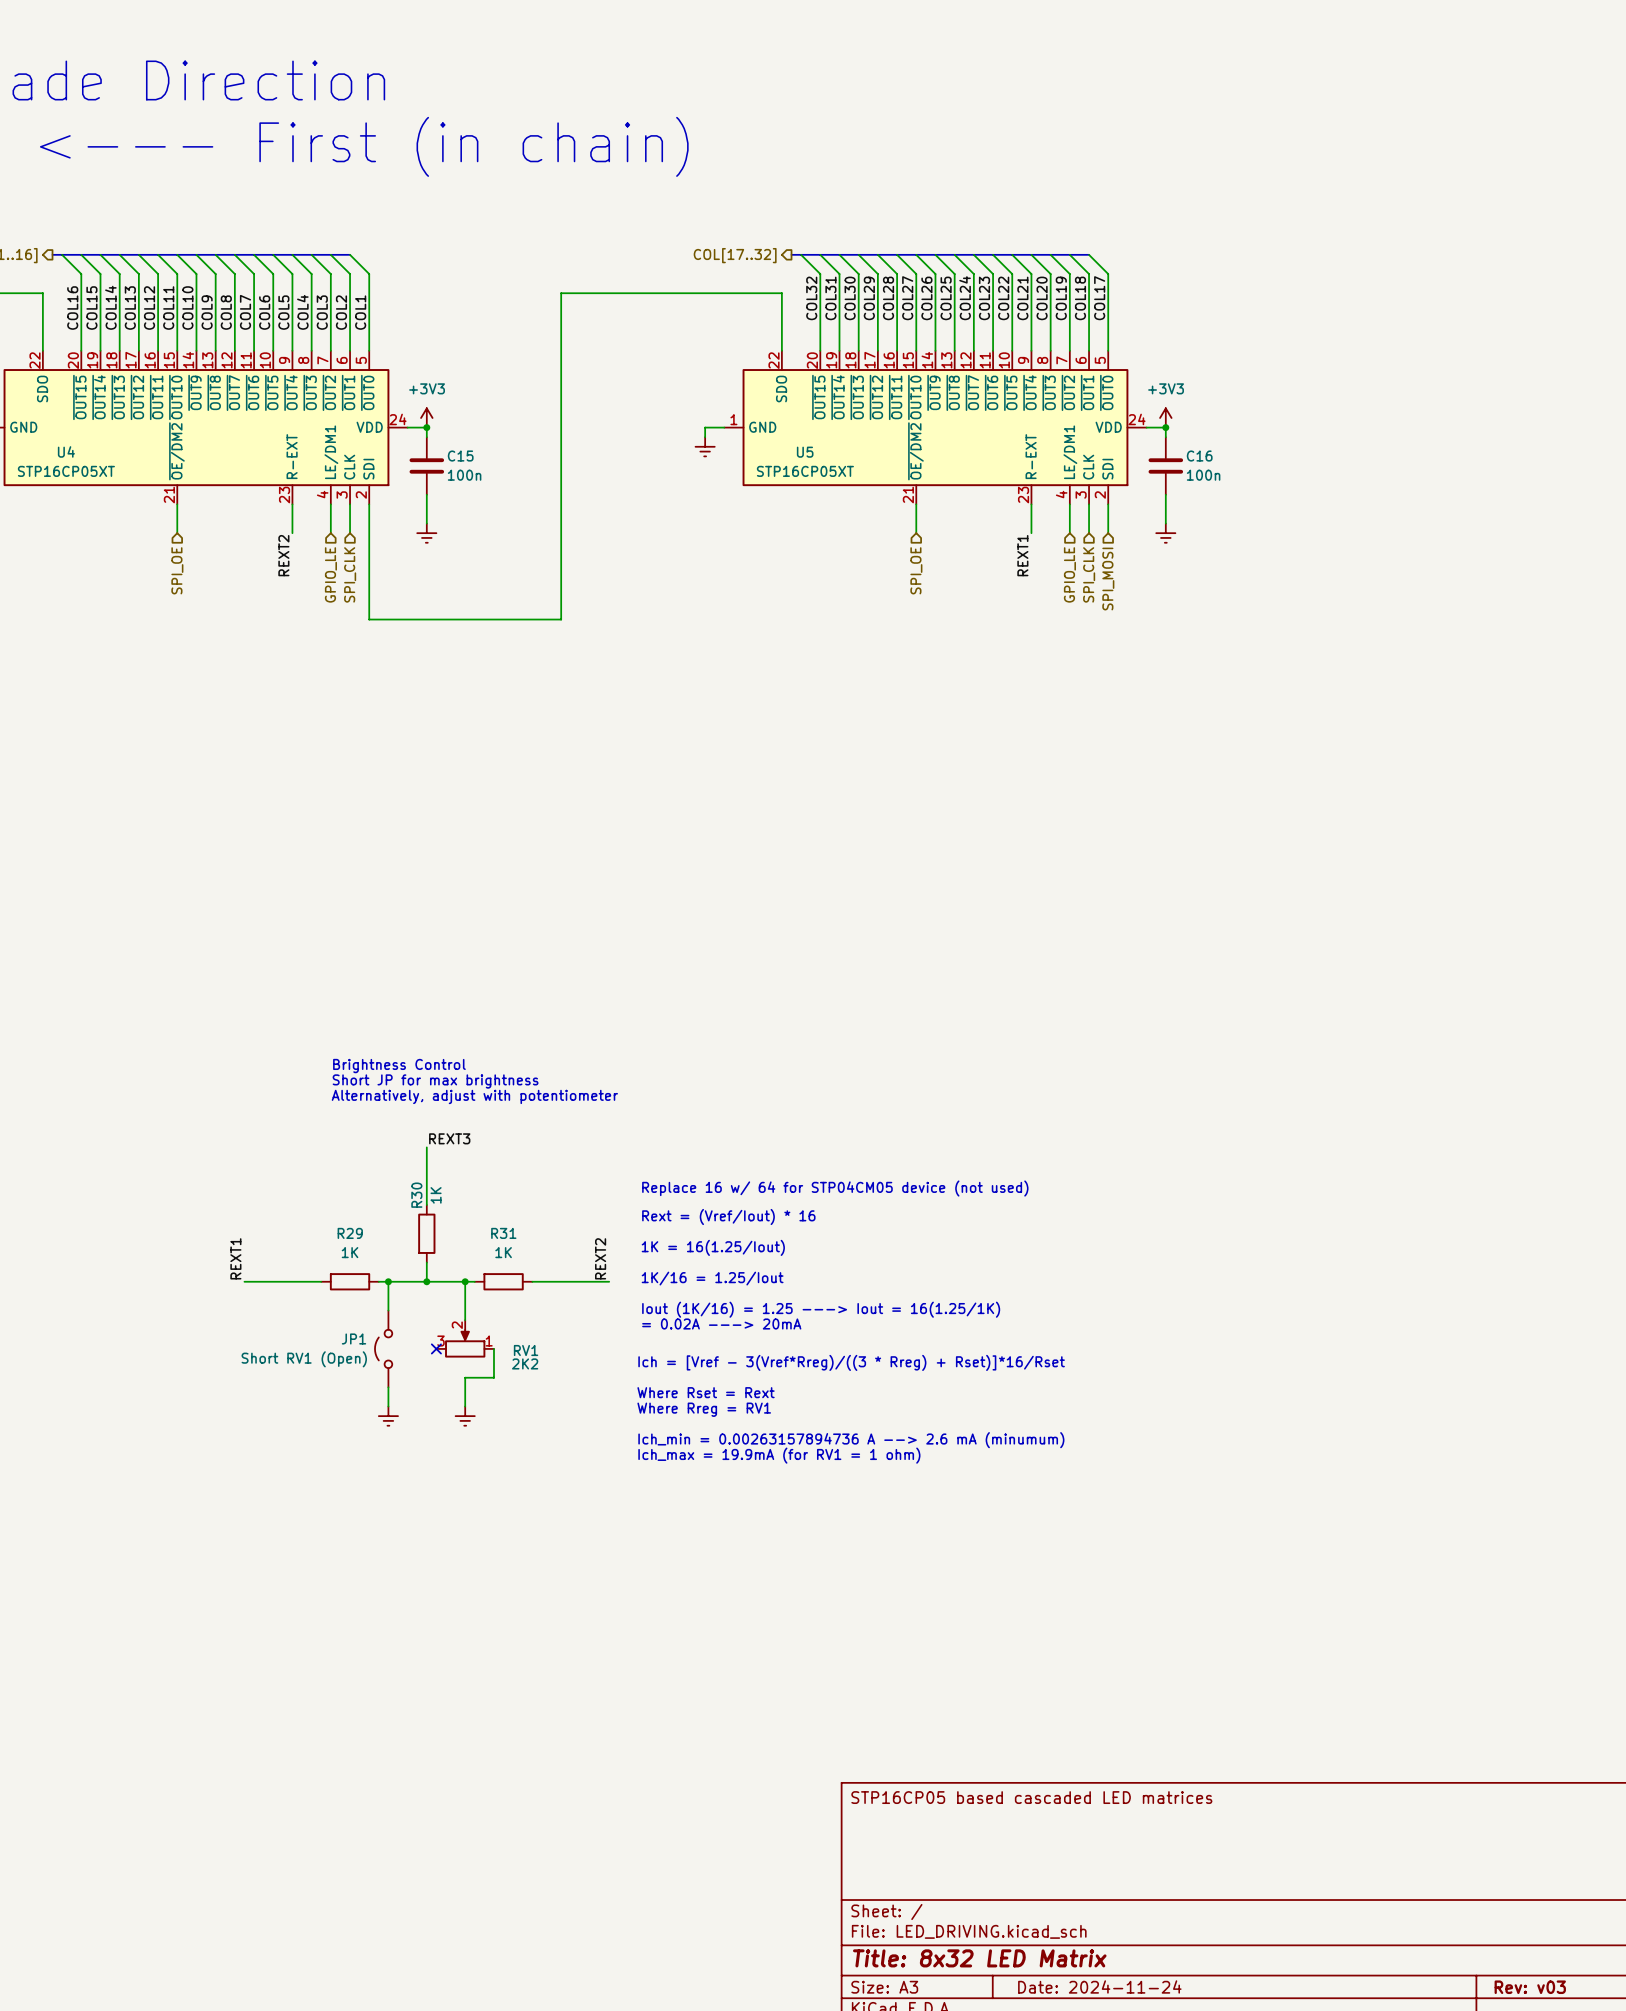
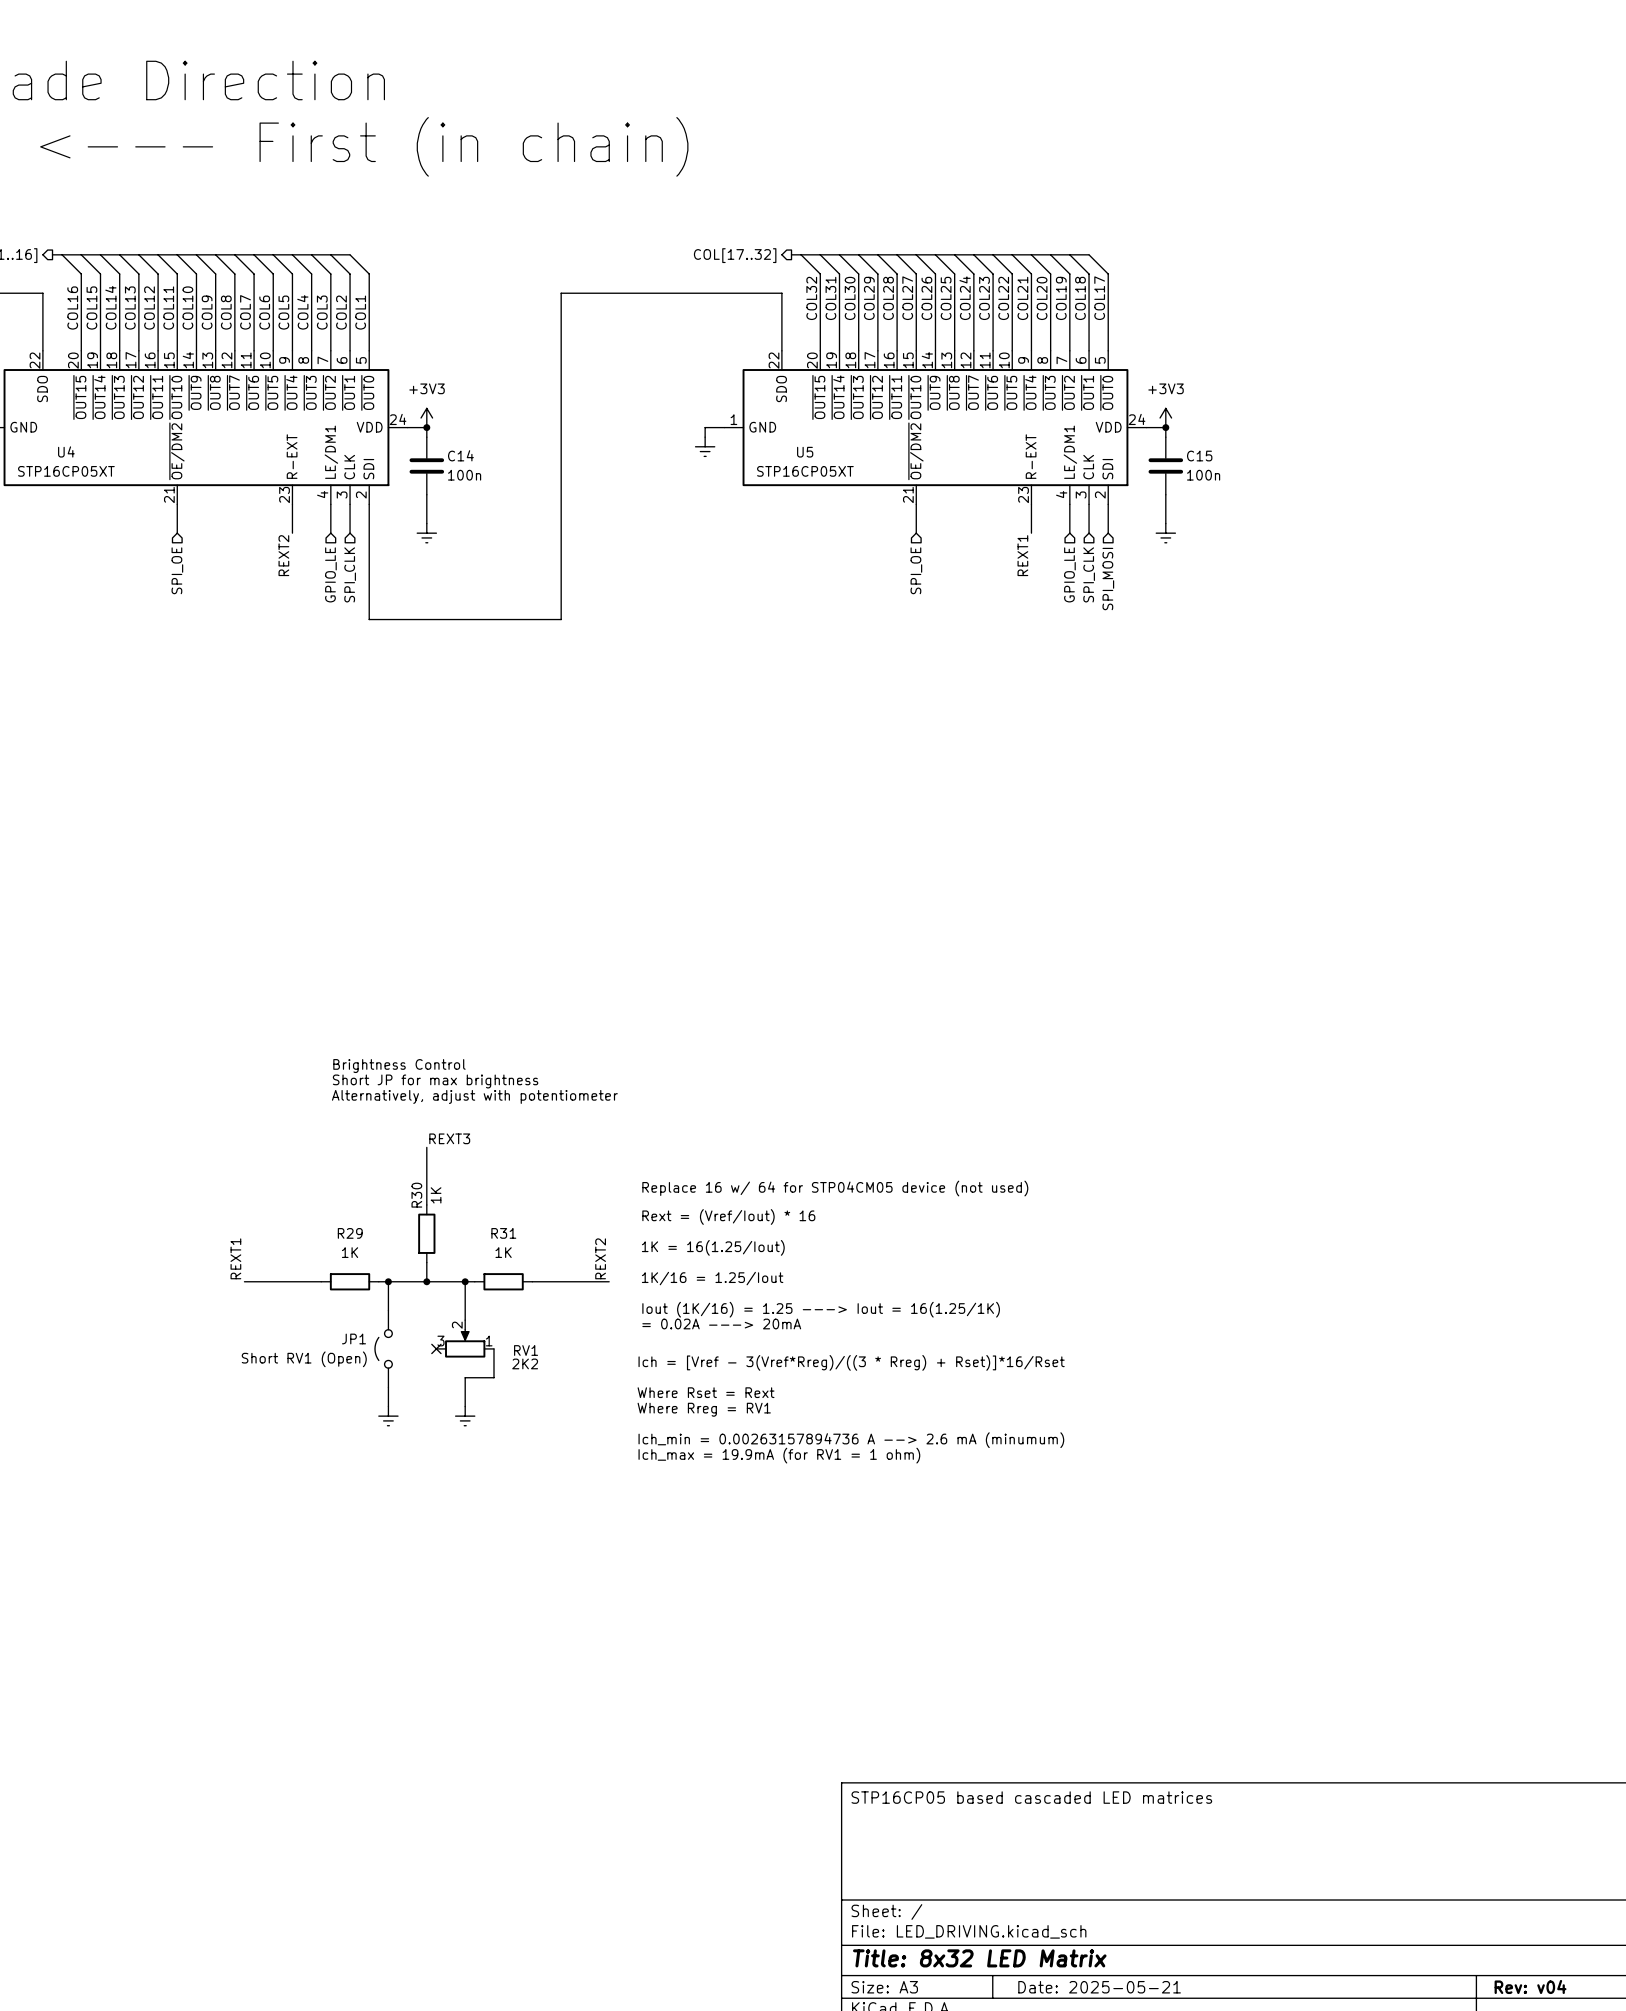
C15 name: C15 (460, 456) -> C14 (460, 455)
C16 name: C16 (1199, 456) -> C15 (1199, 456)
title block: Date: 2024-11-24 (1099, 1986) -> Date: 2025-05-21 (1099, 1987)
title block: Rev: v03 (1530, 1987) -> Rev: v04 (1530, 1986)

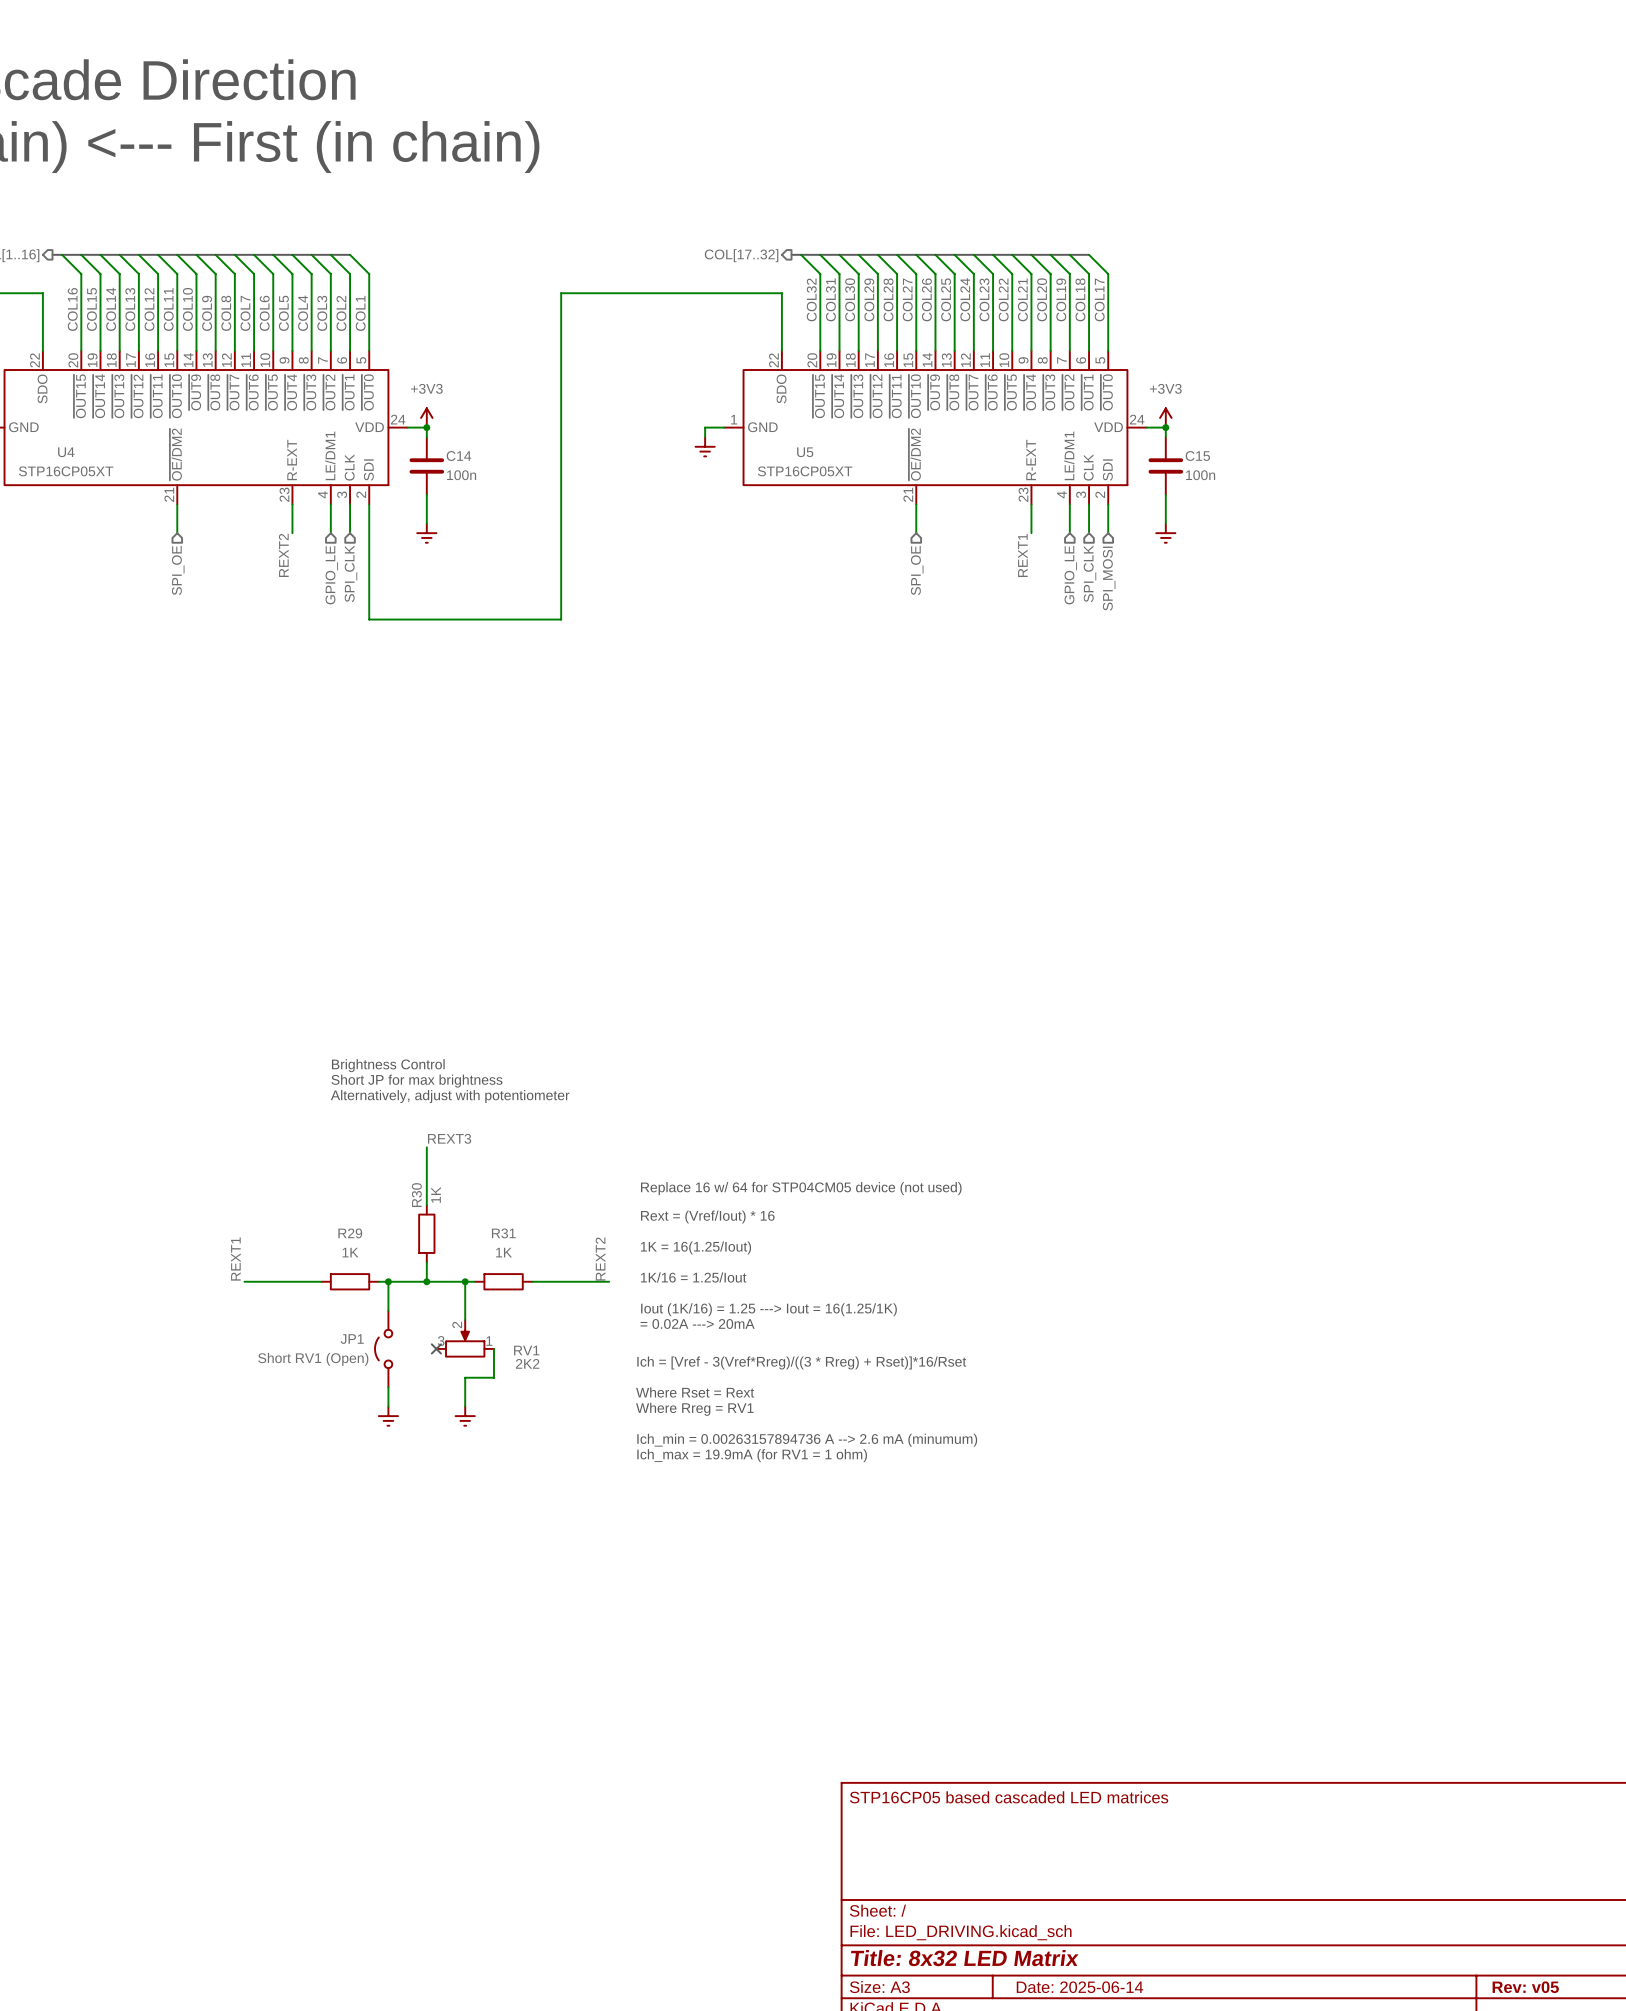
title block: Rev: v04 (1530, 1986) -> Rev: v05 (1525, 1987)
title block: Date: 2025-05-21 (1099, 1987) -> Date: 2025-06-14 (1079, 1987)

